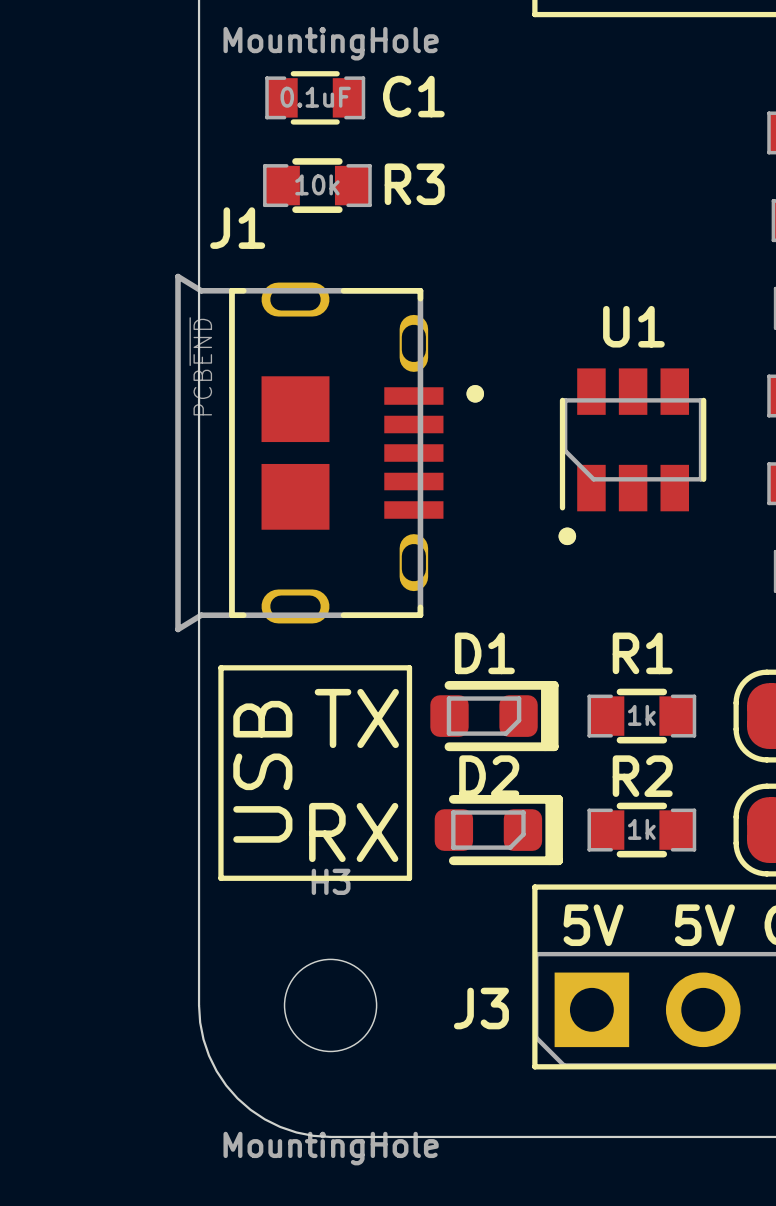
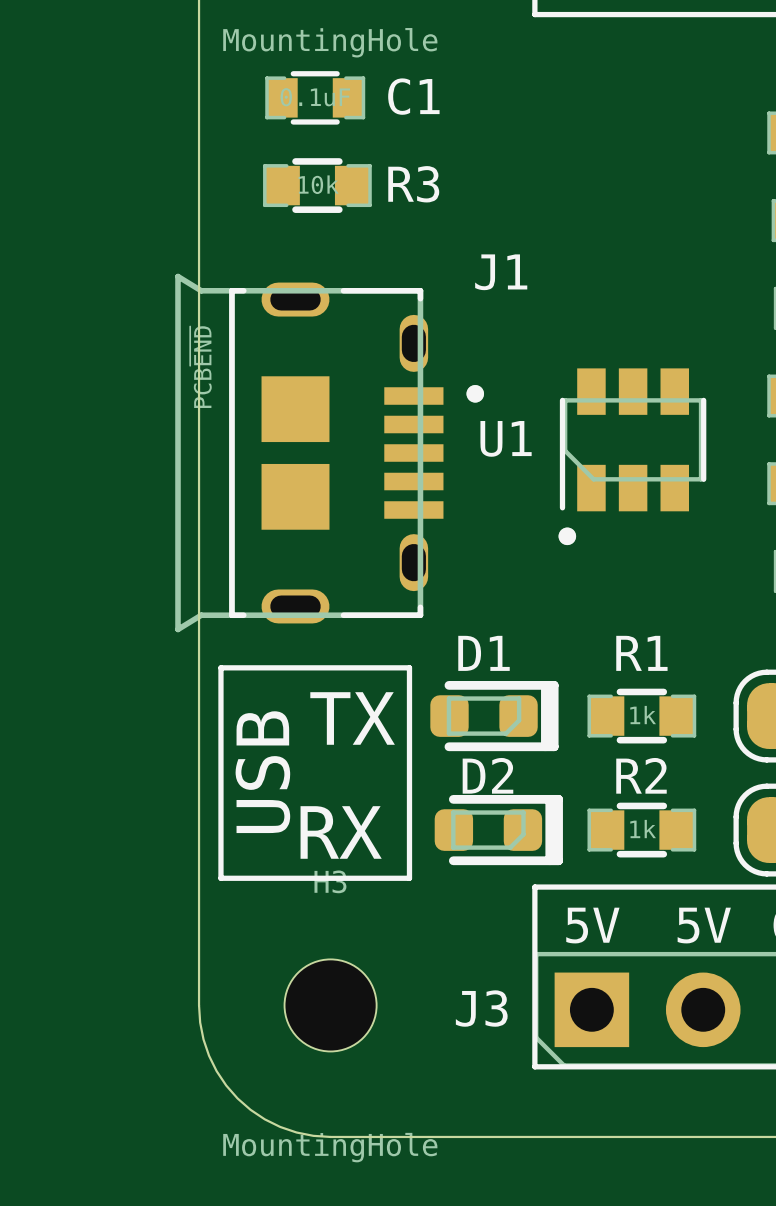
J1 name position: J1 (237, 228) -> J1 (501, 272)
U1 name position: U1 (633, 326) -> U1 (506, 438)

